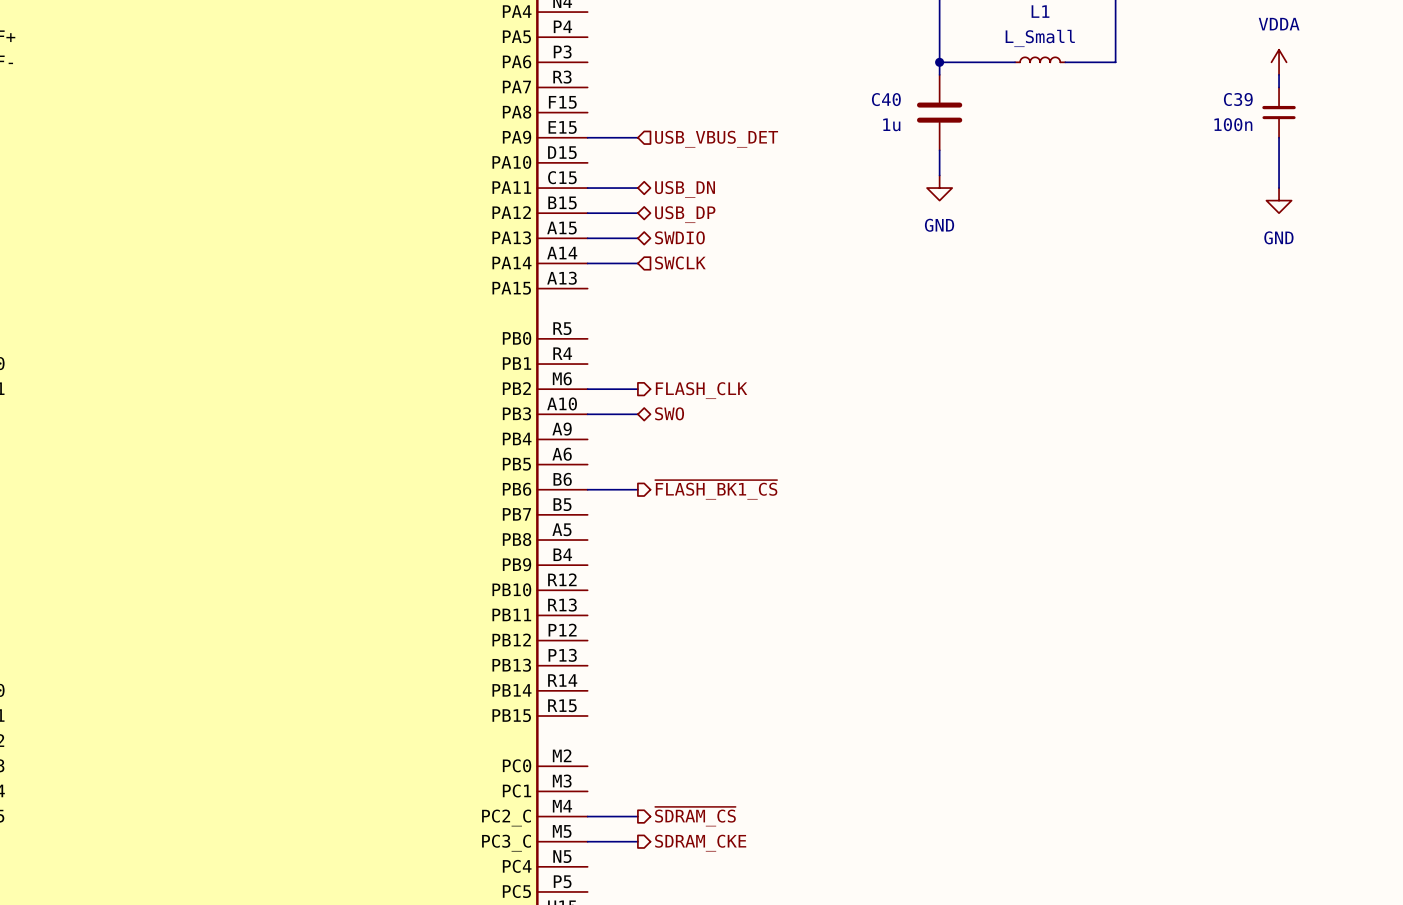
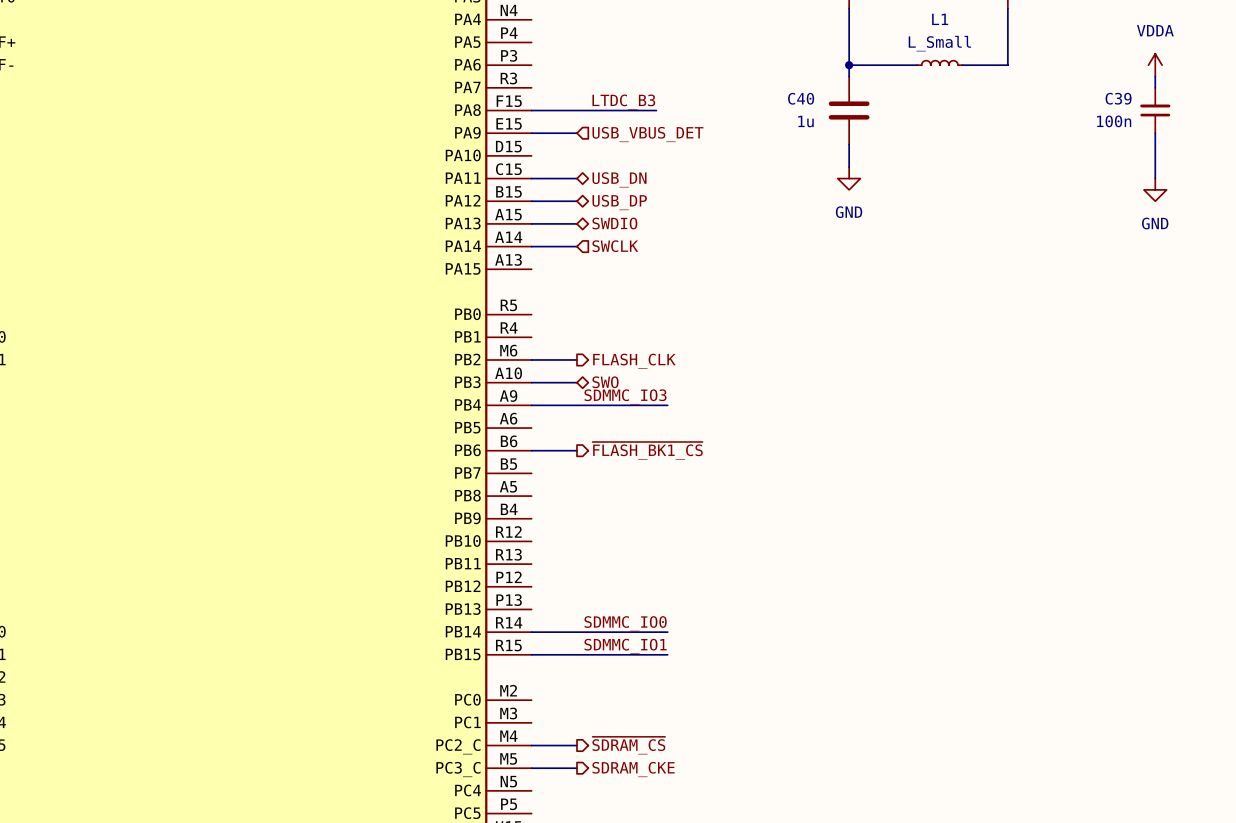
label: none -> LTDC_B3 (623, 102)
wire: none -> (531, 110) (656, 110)
label: none -> SDMMC_IO3 (625, 396)
wire: none -> (531, 405) (667, 405)
label: none -> SDMMC_IO0 (625, 623)
wire: none -> (531, 632) (667, 632)
label: none -> SDMMC_IO1 (625, 646)
wire: none -> (531, 654) (667, 654)

